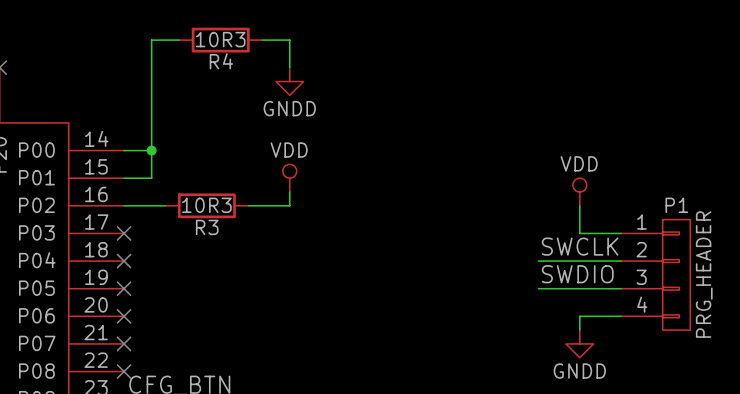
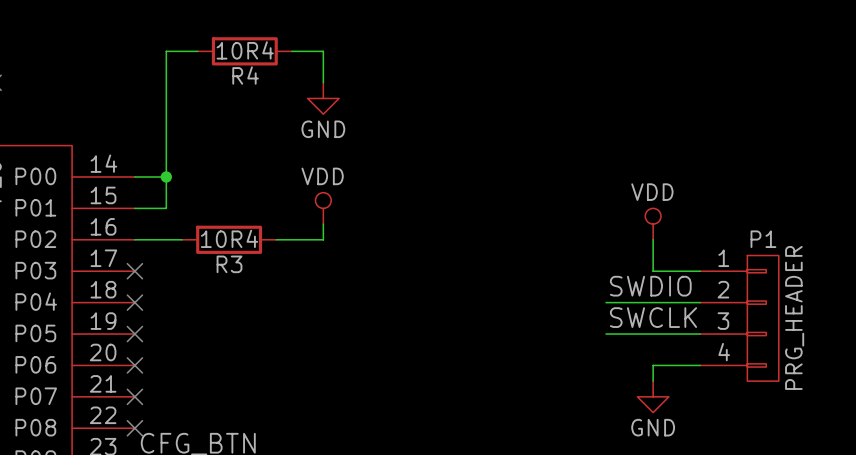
R4 value: 10R3 (220, 39) -> 10R4 (245, 50)
power symbol: GNDD (289, 81) -> GND (323, 98)
R3 value: 10R3 (206, 205) -> 10R4 (229, 238)
label: SWCLK (580, 246) -> SWDIO (650, 286)
label: SWDIO (577, 274) -> SWCLK (653, 317)
power symbol: GNDD (579, 343) -> GND (653, 396)

